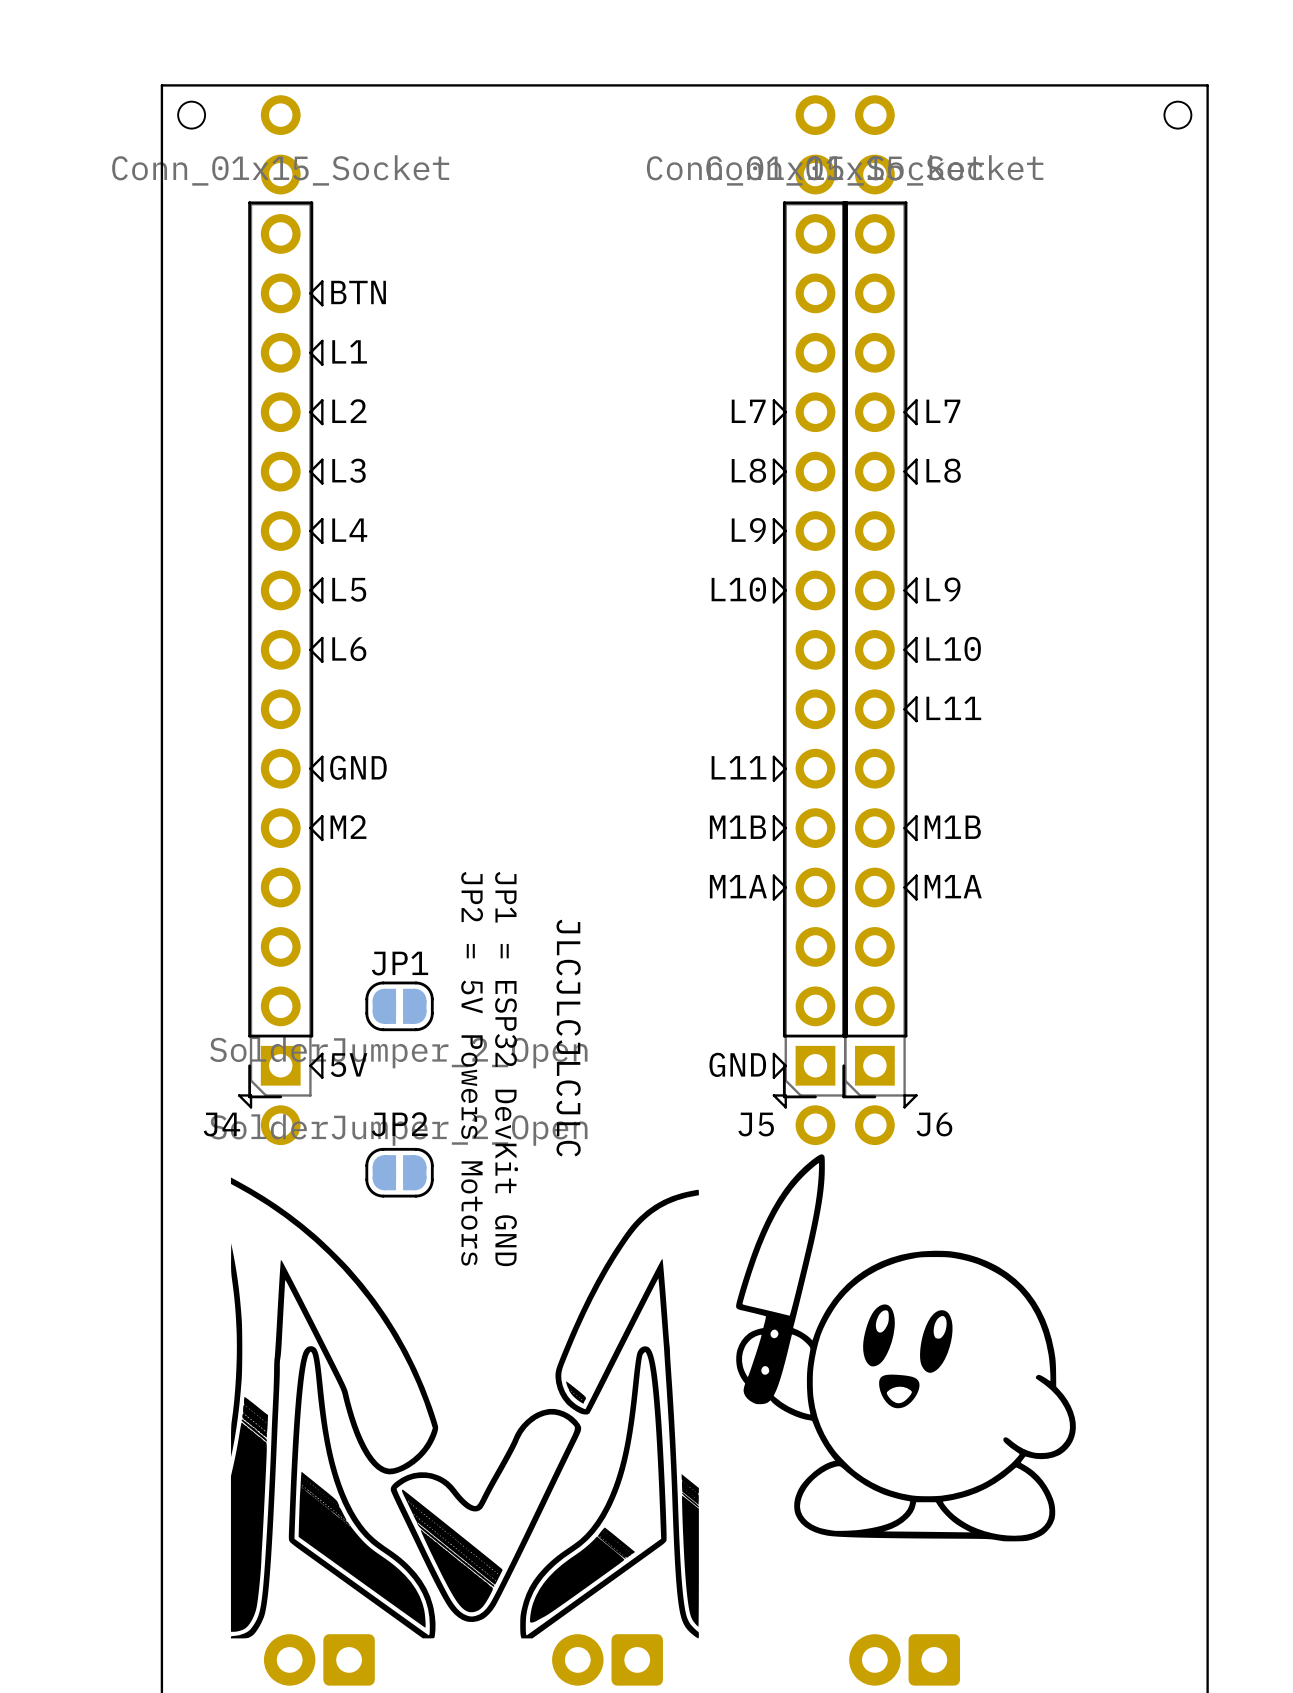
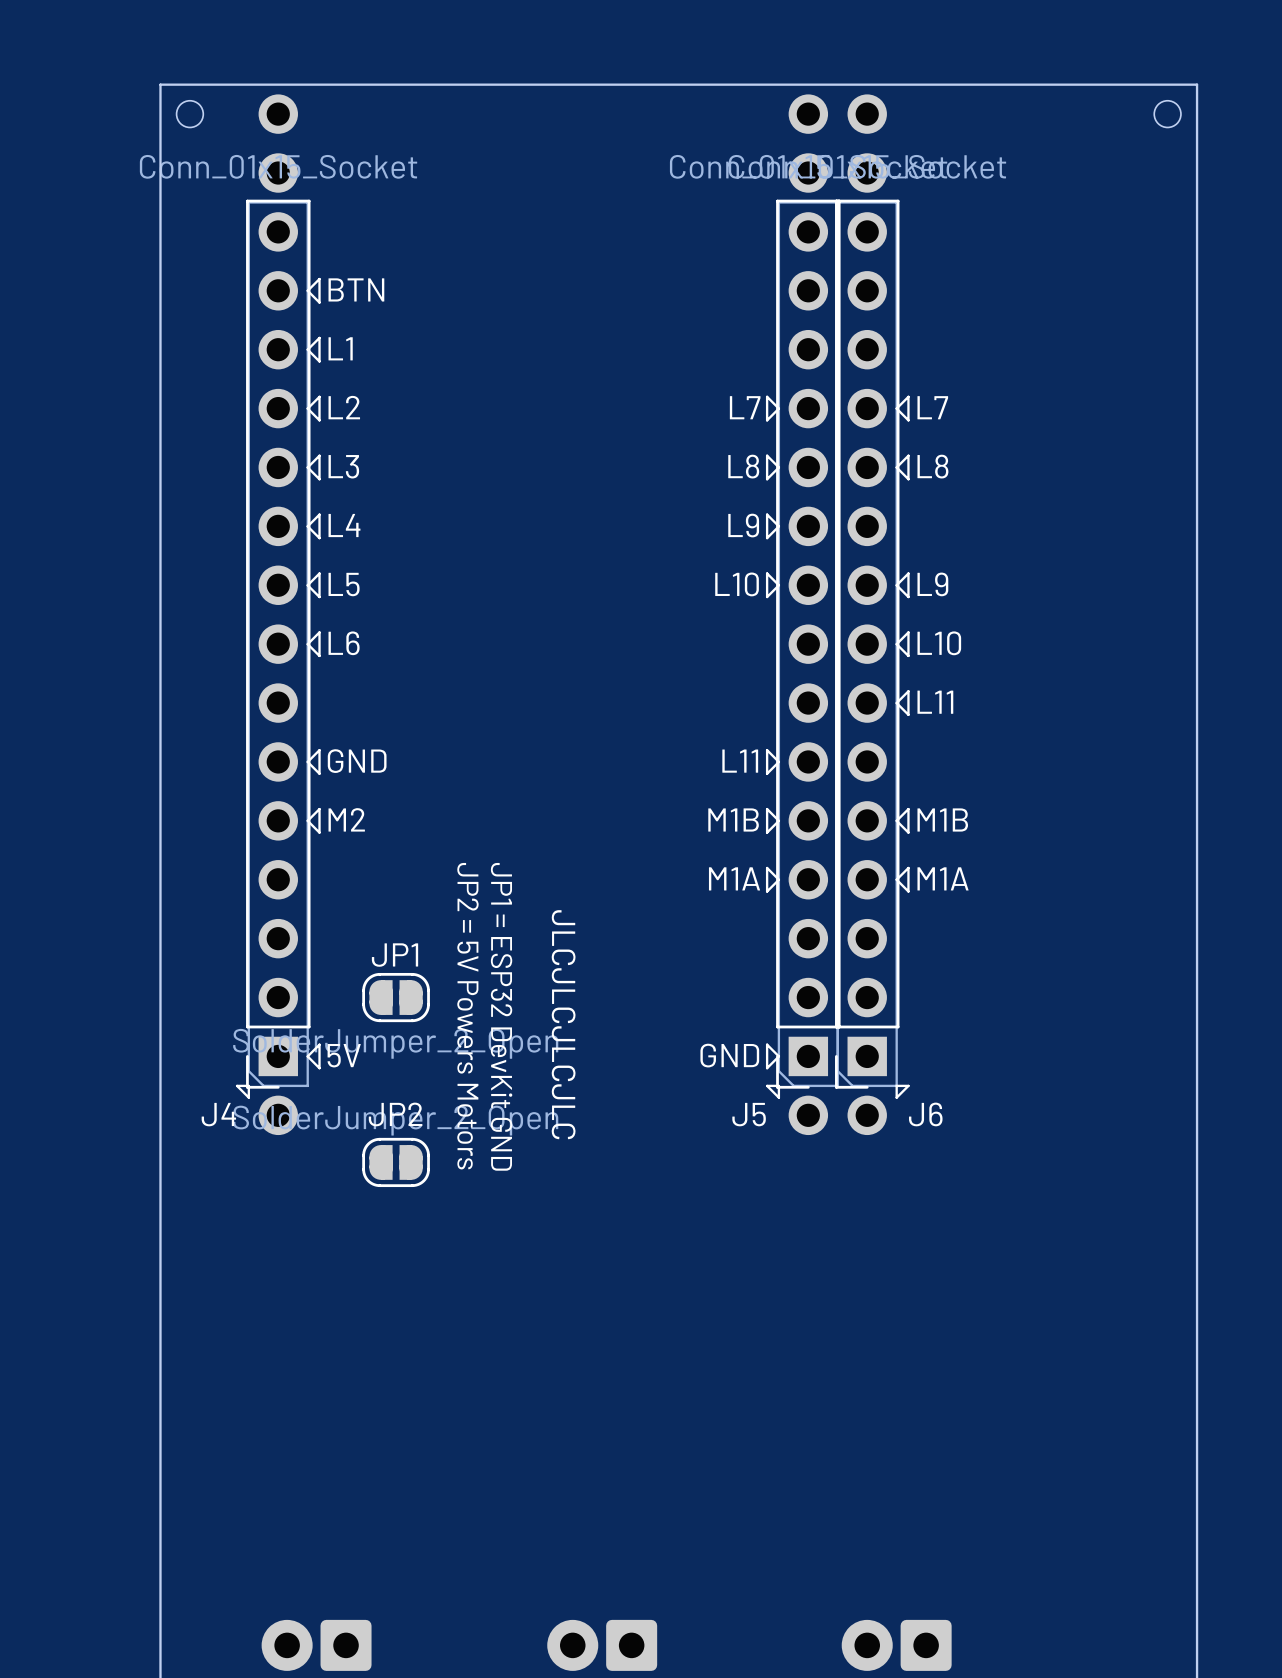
drawing: [736, 1154, 1076, 1542] -> none
drawing: [230, 1177, 699, 1639] -> none

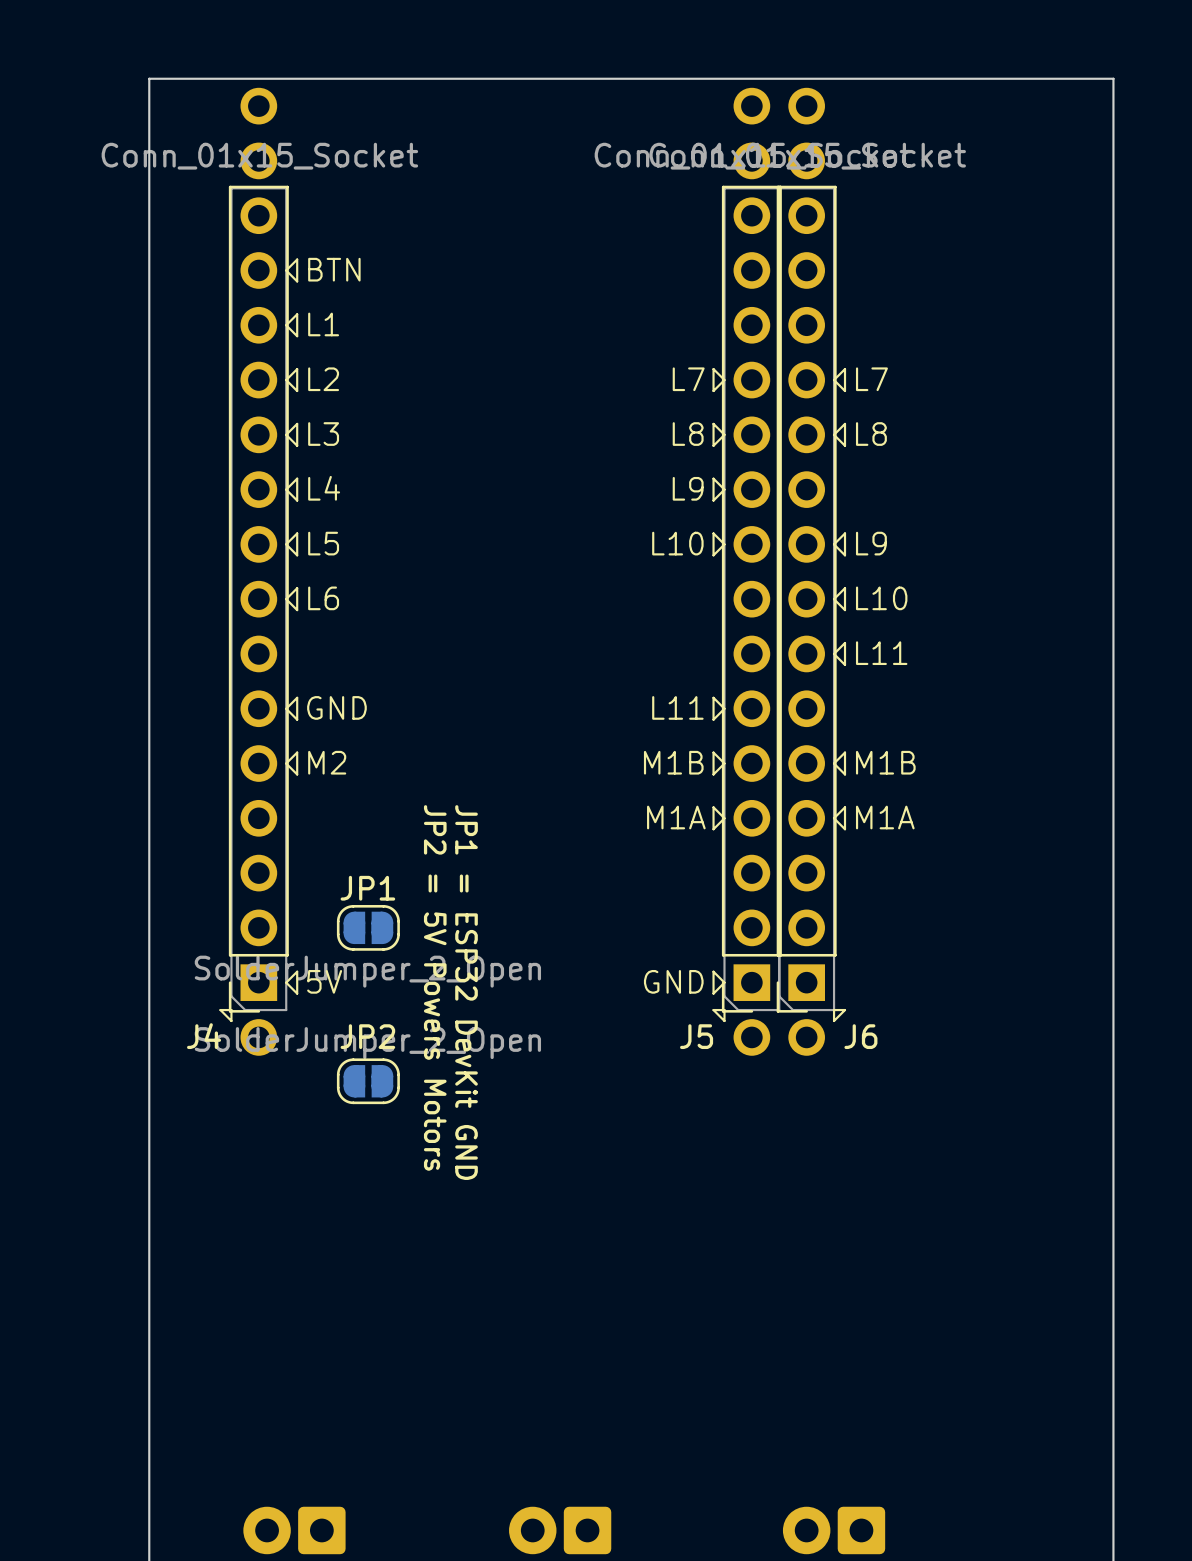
round board edge: [176, 100, 204, 129] -> none
round board edge: [1153, 100, 1182, 129] -> none
text: JLCJLCJLCJLC (563, 1024) -> none

